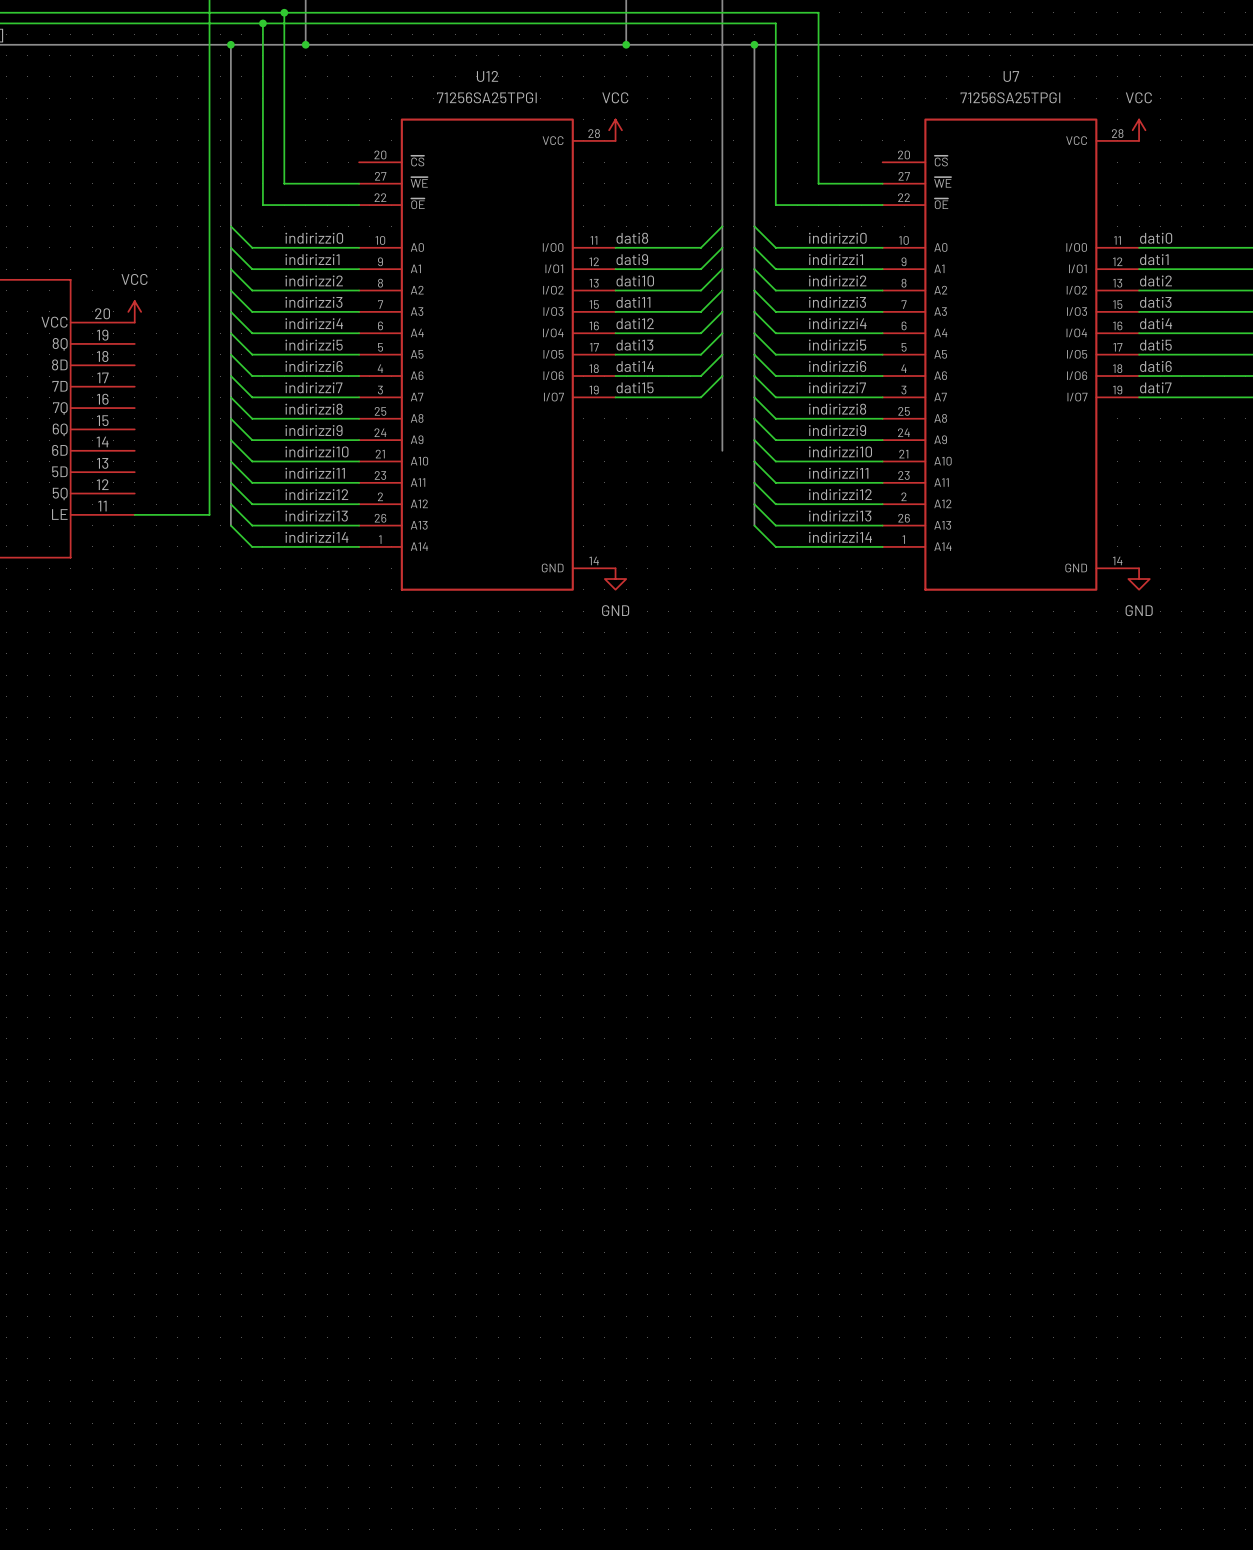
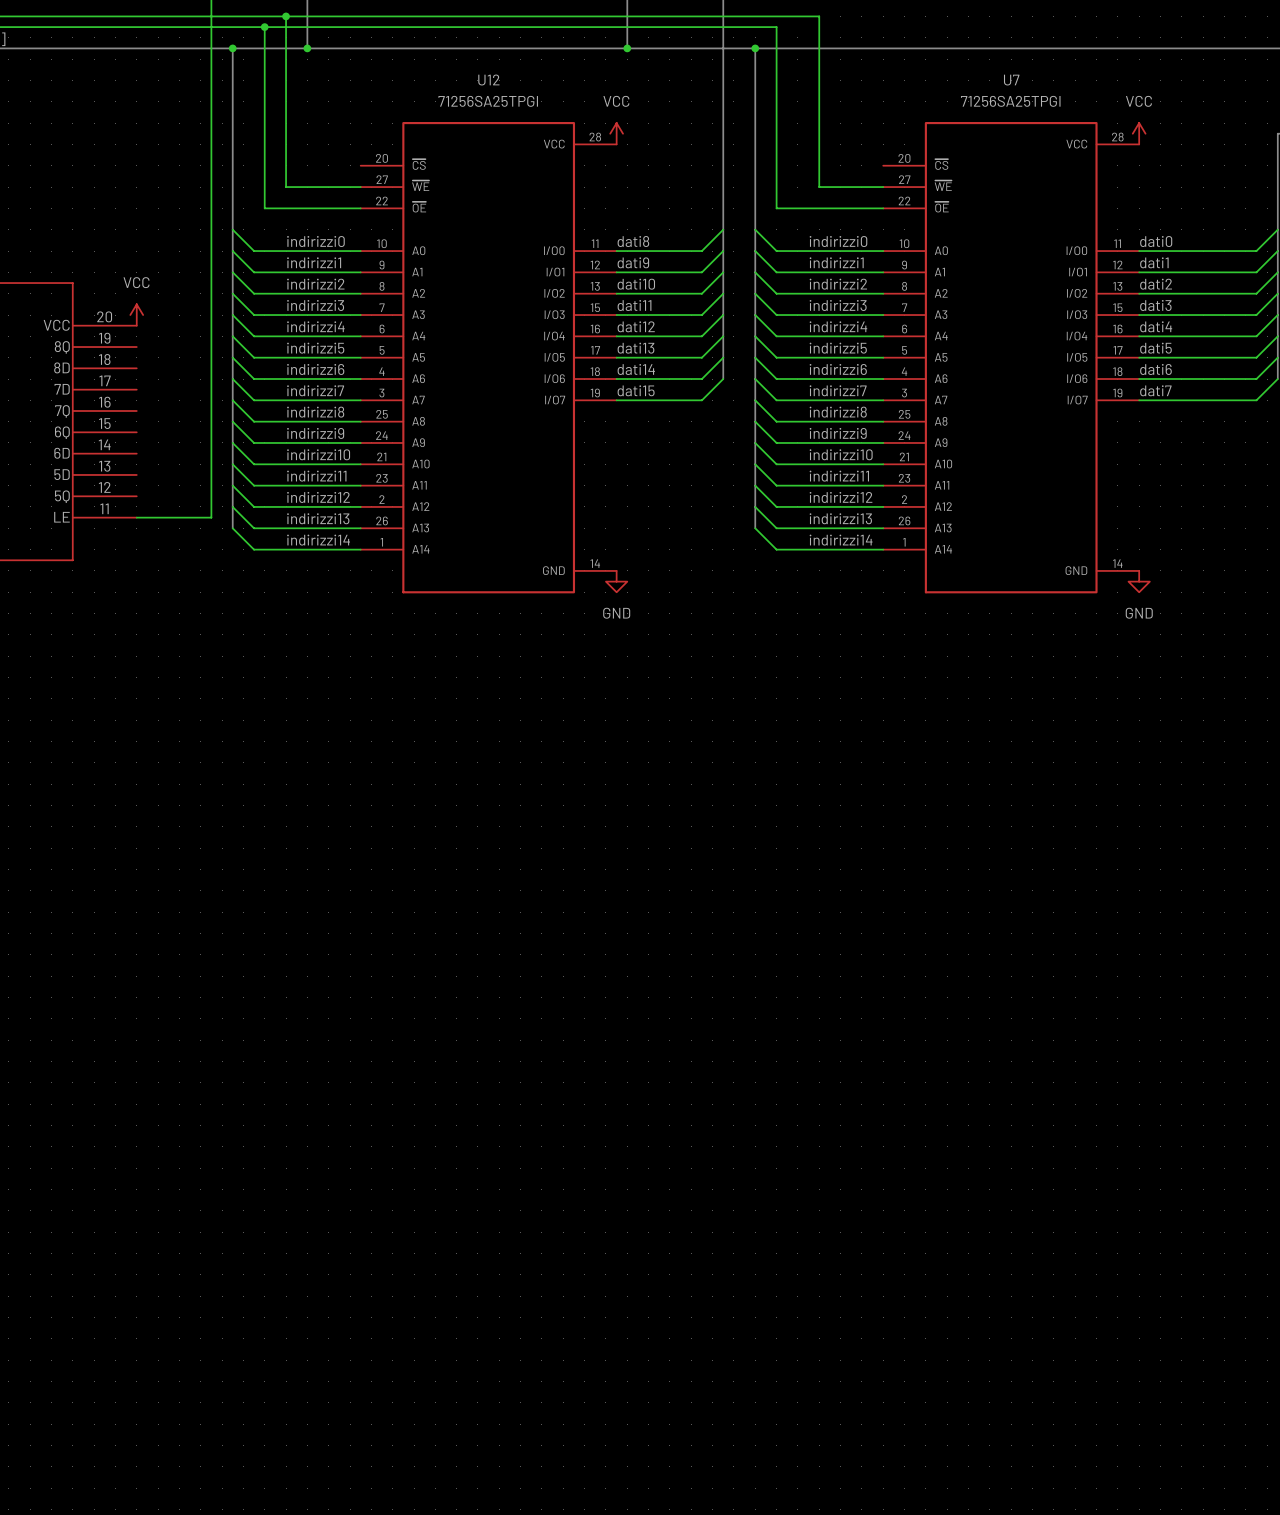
bus: (722, 376) (722, 450) -> none

